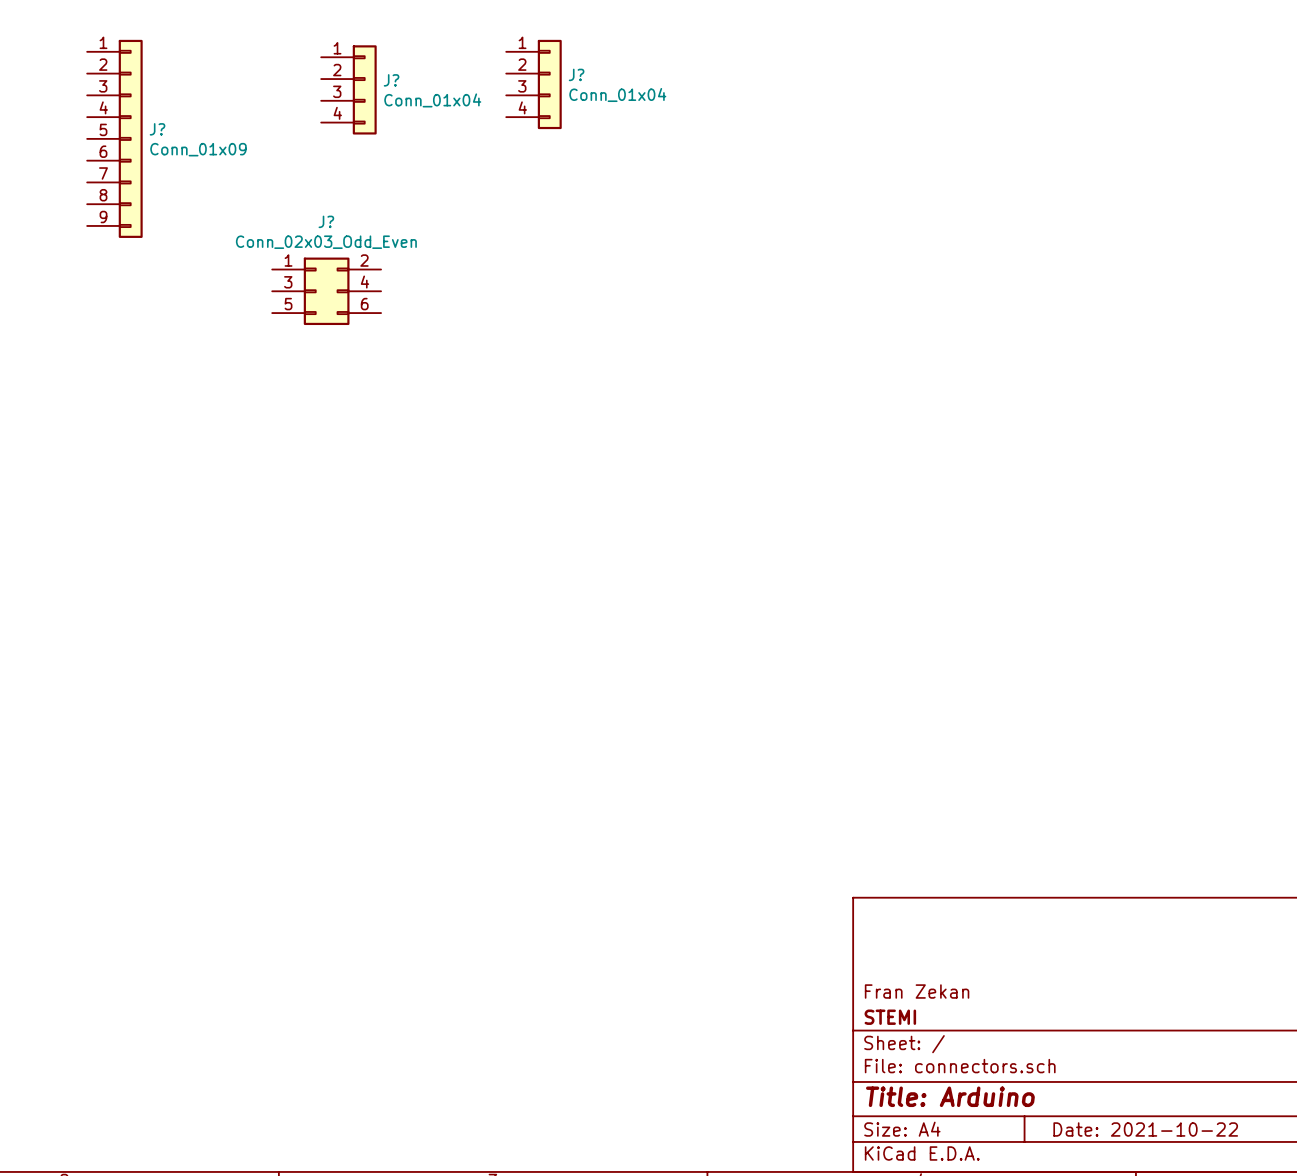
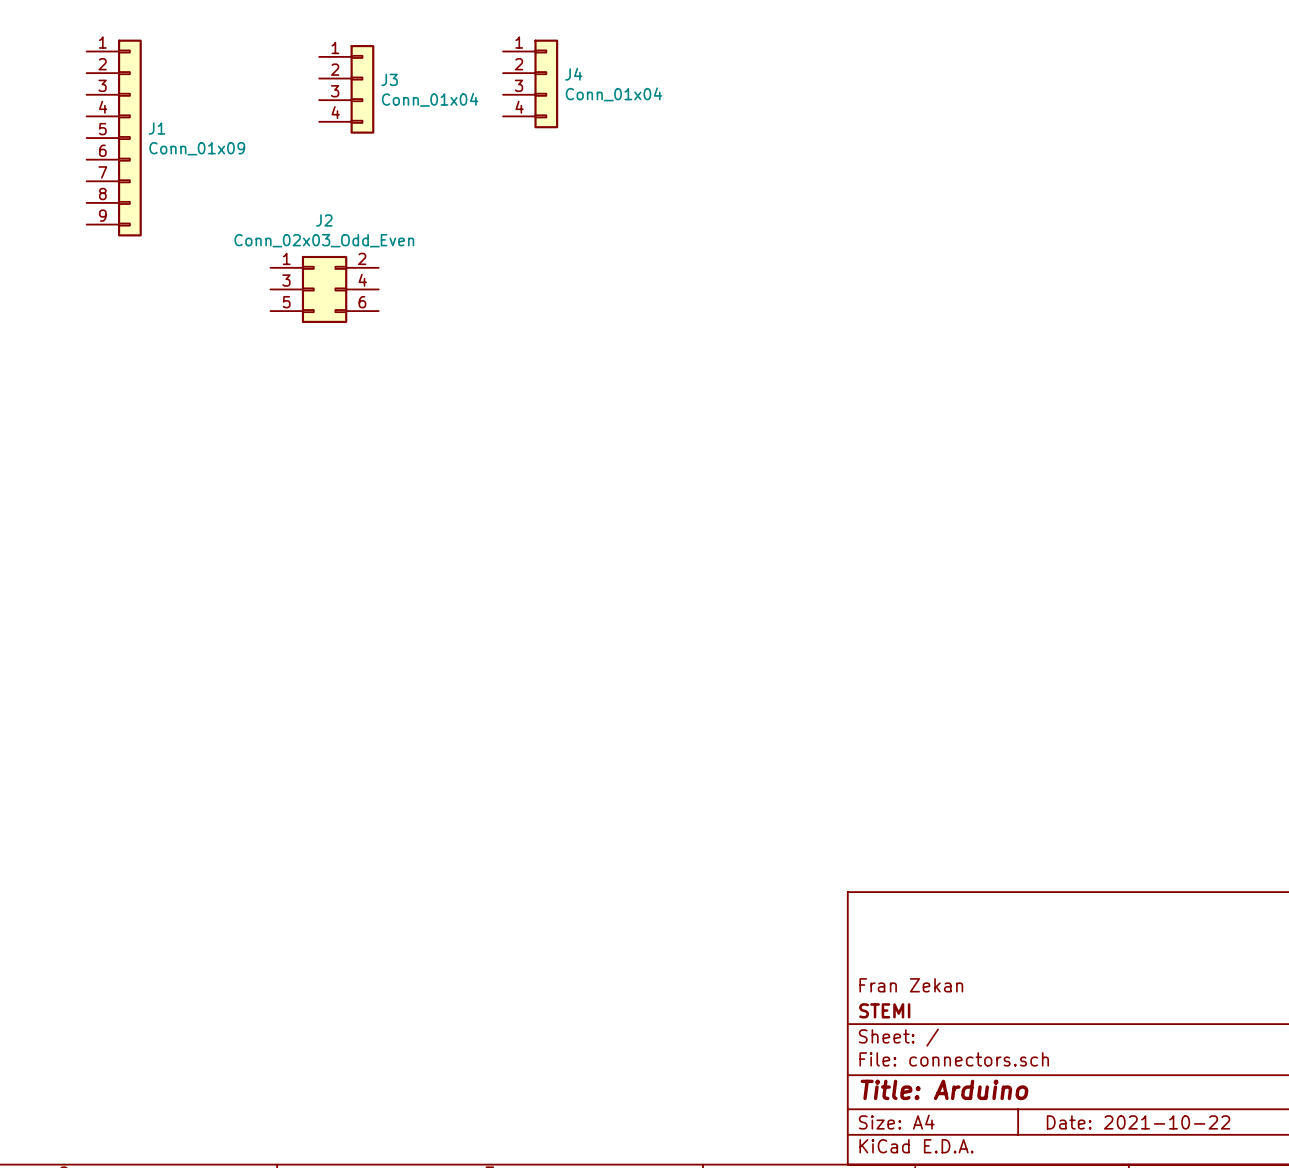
J? name: J? (576, 74) -> J4 (573, 74)
J? name: J? (391, 80) -> J3 (389, 79)
J? name: J? (157, 129) -> J1 (157, 128)
J? name: J? (326, 221) -> J2 (324, 220)

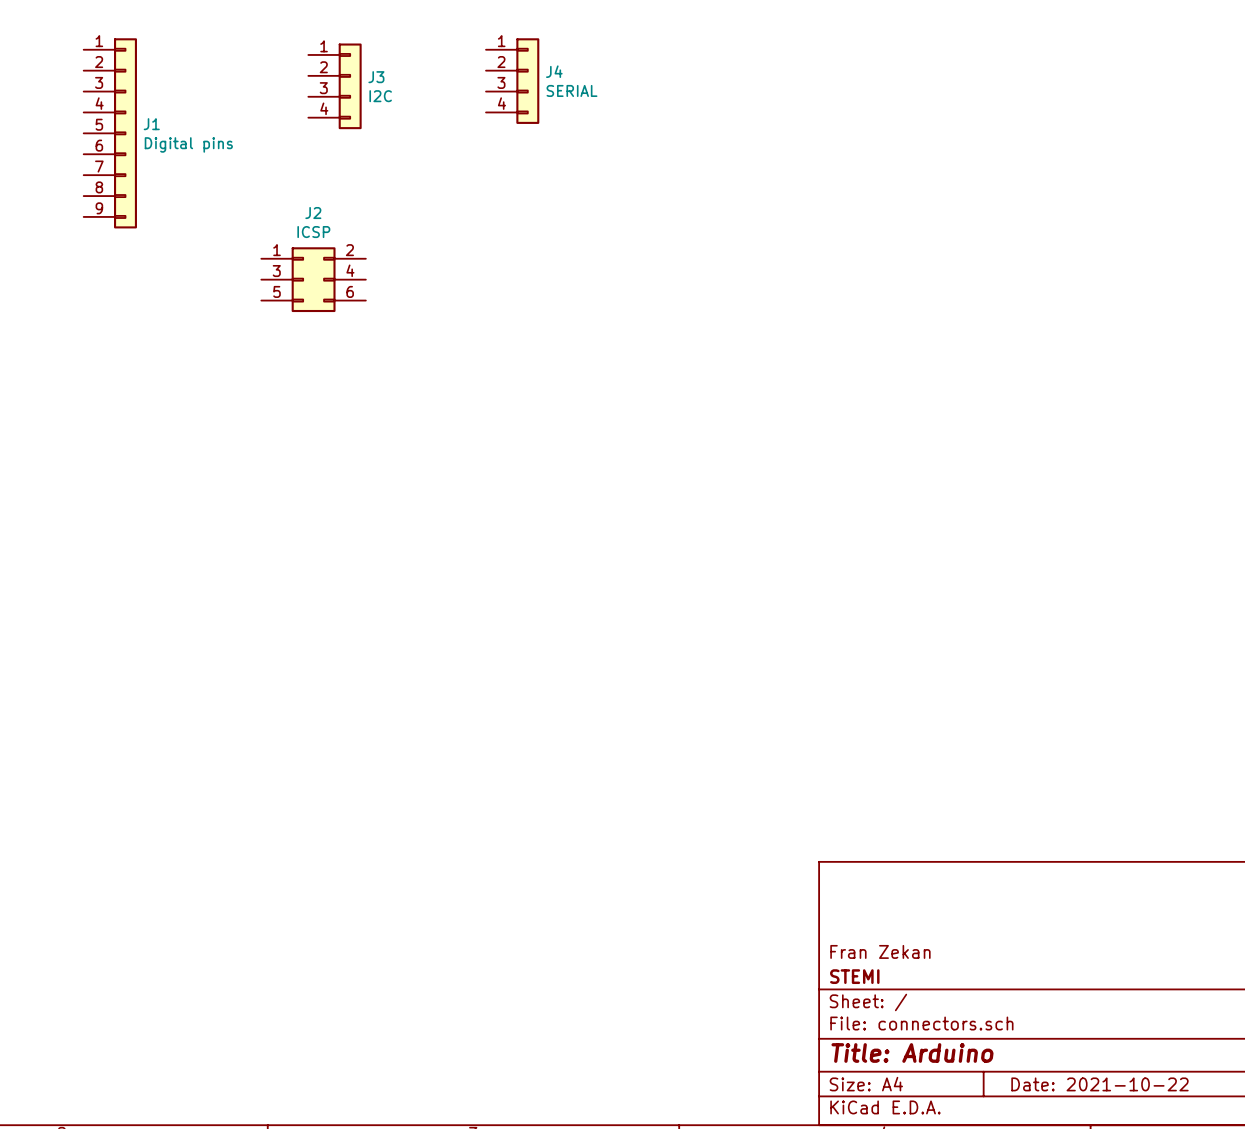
J4 value: Conn_01x04 (613, 94) -> SERIAL (571, 90)
J3 value: Conn_01x04 (430, 99) -> I2C (380, 96)
J1 value: Conn_01x09 (197, 148) -> Digital pins (188, 144)
J2 value: Conn_02x03_Odd_Even (324, 240) -> ICSP (313, 232)

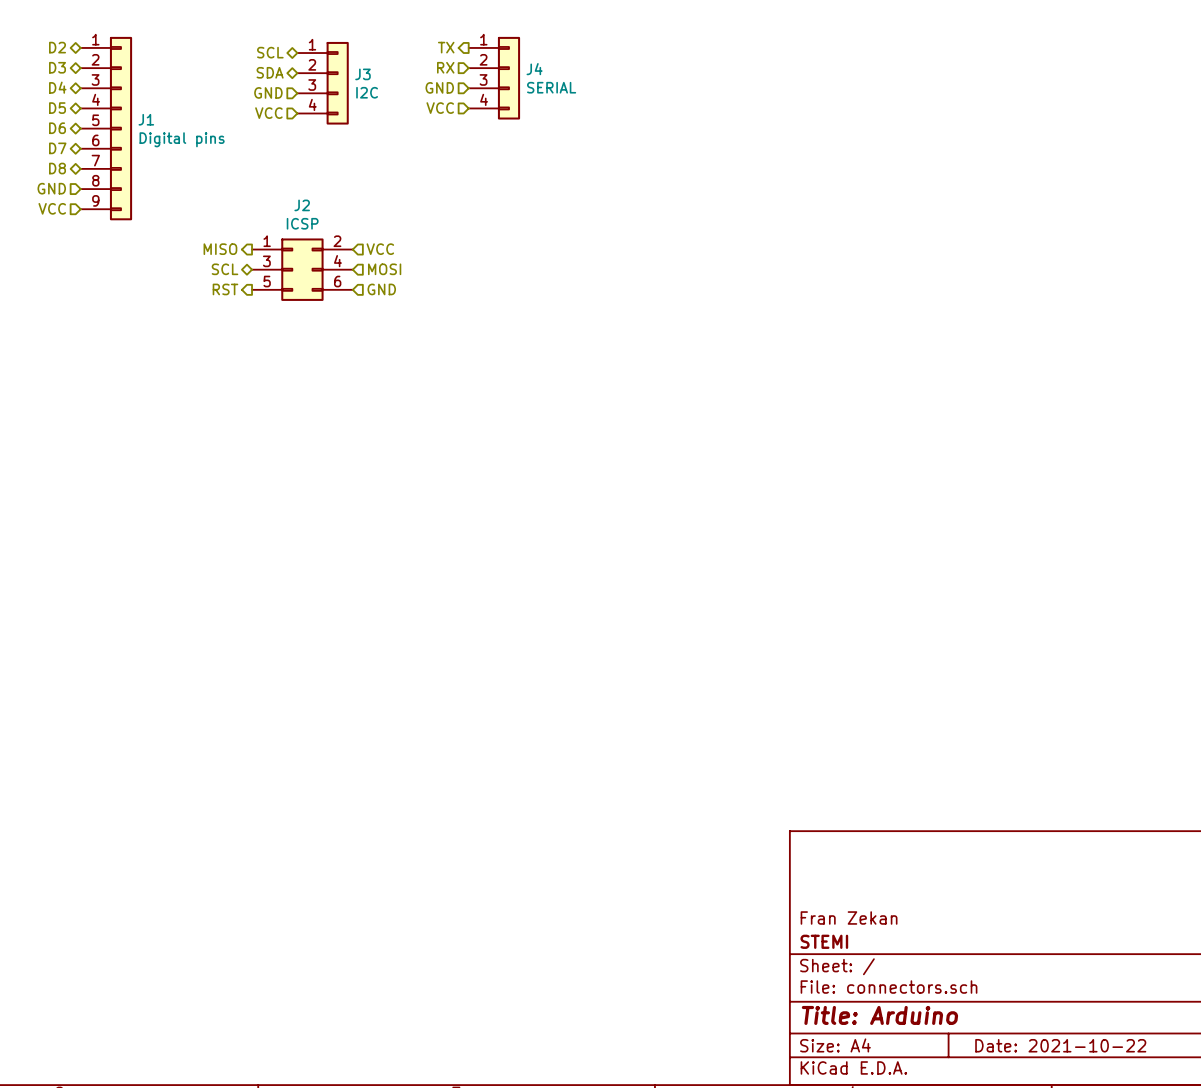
hierarchical label: none -> D2 (57, 47)
hierarchical label: none -> TX (446, 47)
hierarchical label: none -> SCL (270, 52)
hierarchical label: none -> D3 (57, 67)
hierarchical label: none -> RX (445, 67)
hierarchical label: none -> SDA (270, 72)
hierarchical label: none -> D4 (57, 87)
hierarchical label: none -> GND (439, 87)
hierarchical label: none -> GND (268, 92)
hierarchical label: none -> D5 (57, 108)
hierarchical label: none -> VCC (440, 108)
hierarchical label: none -> VCC (268, 113)
hierarchical label: none -> D6 (57, 128)
hierarchical label: none -> D7 (57, 148)
hierarchical label: none -> D8 (57, 168)
hierarchical label: none -> GND (51, 188)
hierarchical label: none -> VCC (52, 208)
hierarchical label: none -> MISO (220, 249)
hierarchical label: none -> VCC (380, 249)
hierarchical label: none -> SCL (224, 269)
hierarchical label: none -> MOSI (384, 269)
hierarchical label: none -> RST (225, 289)
hierarchical label: none -> GND (381, 289)

